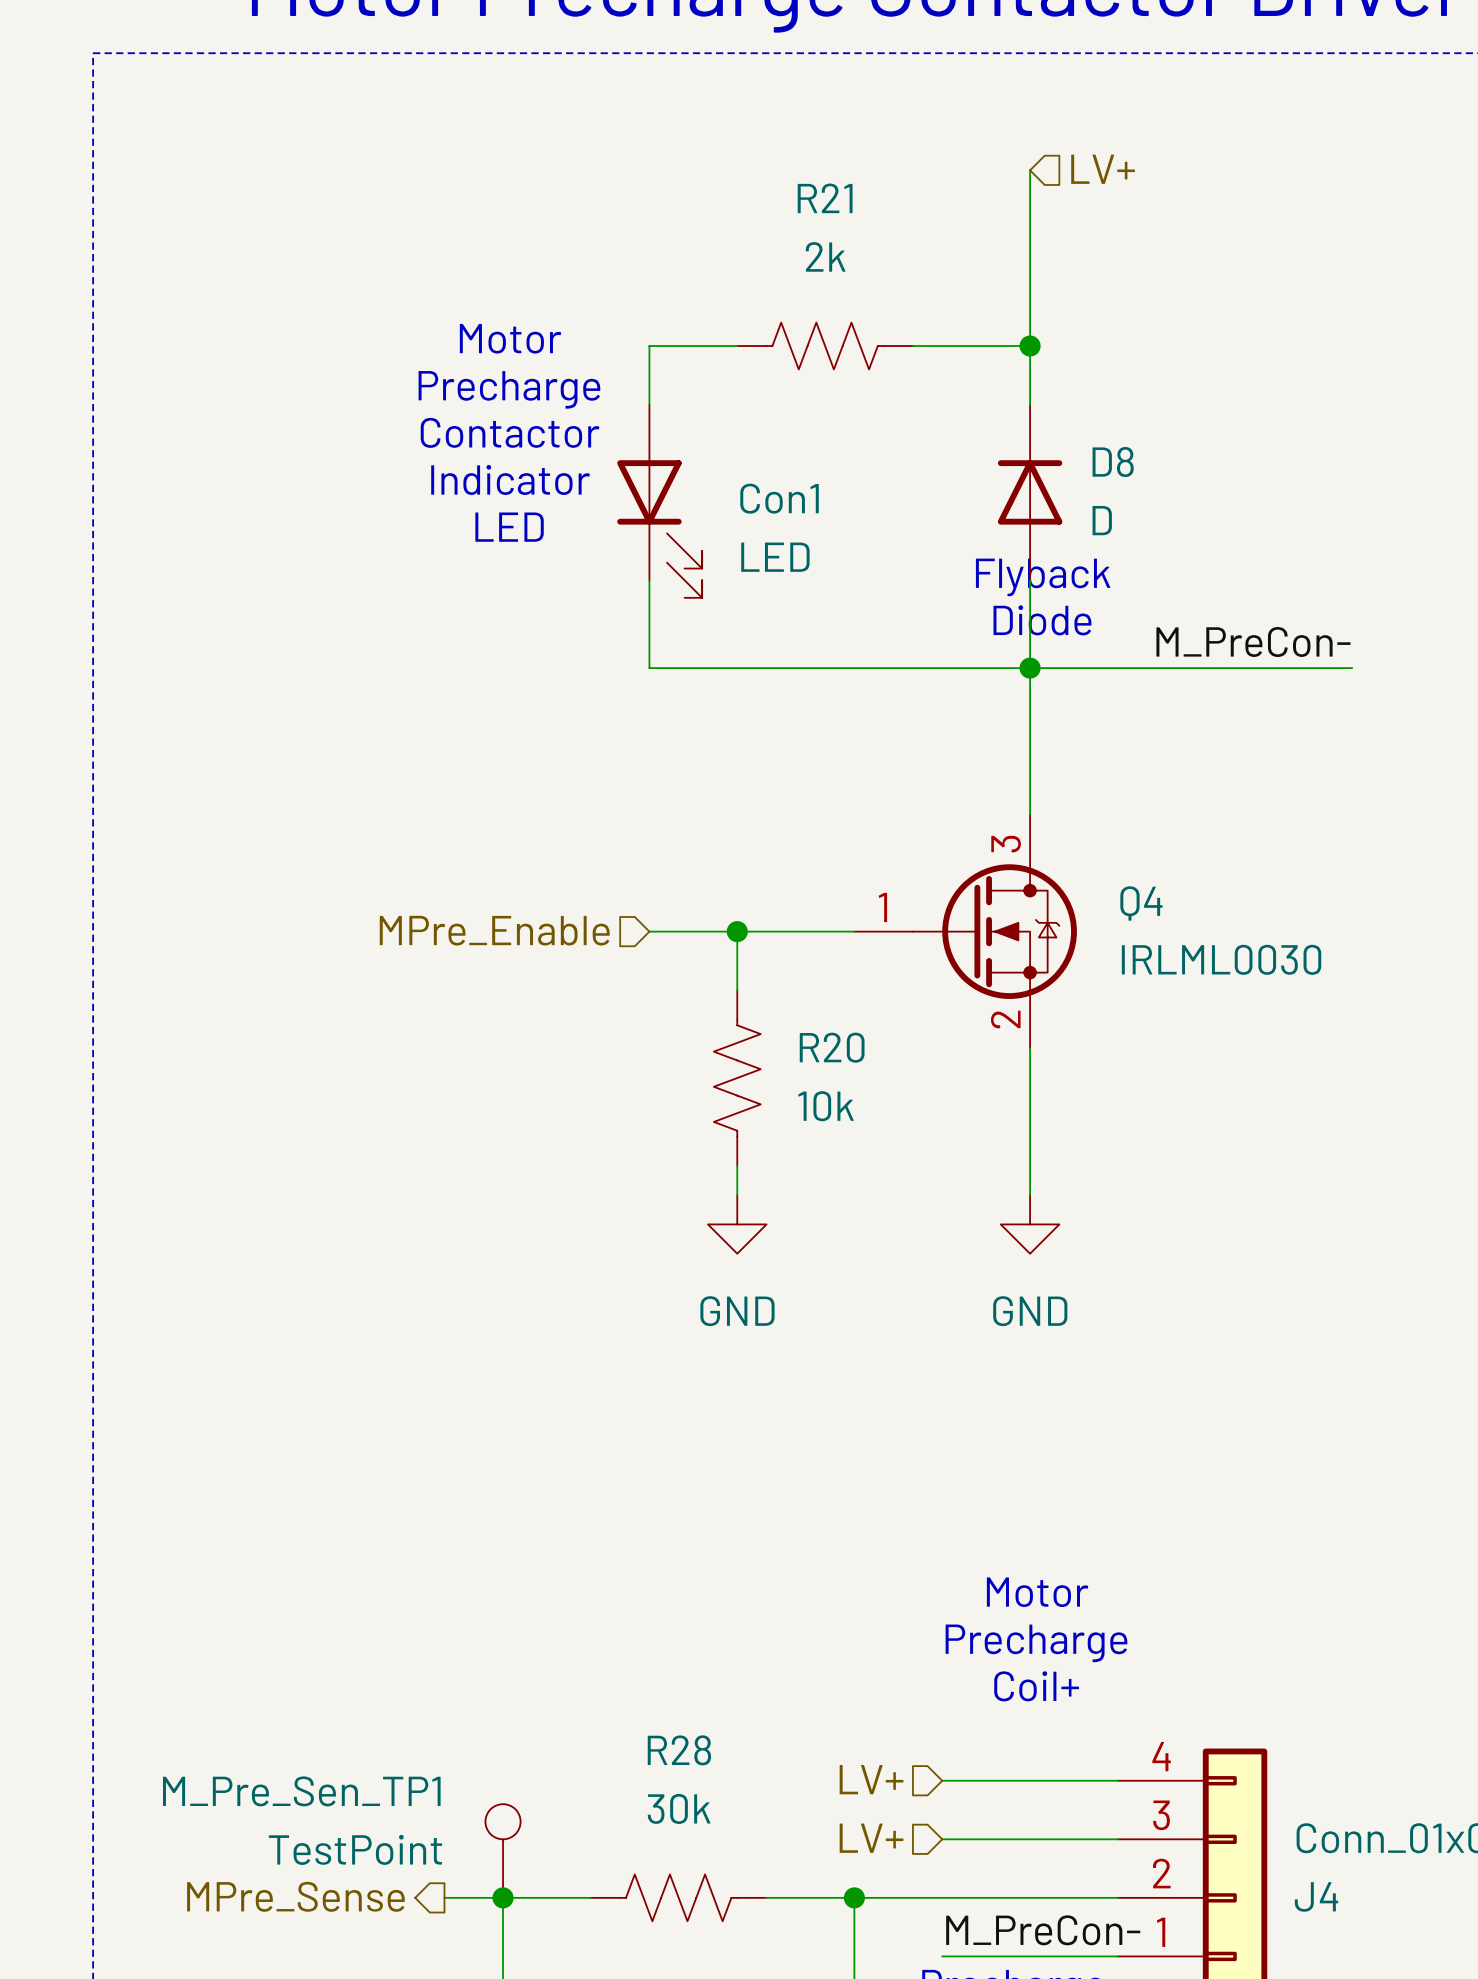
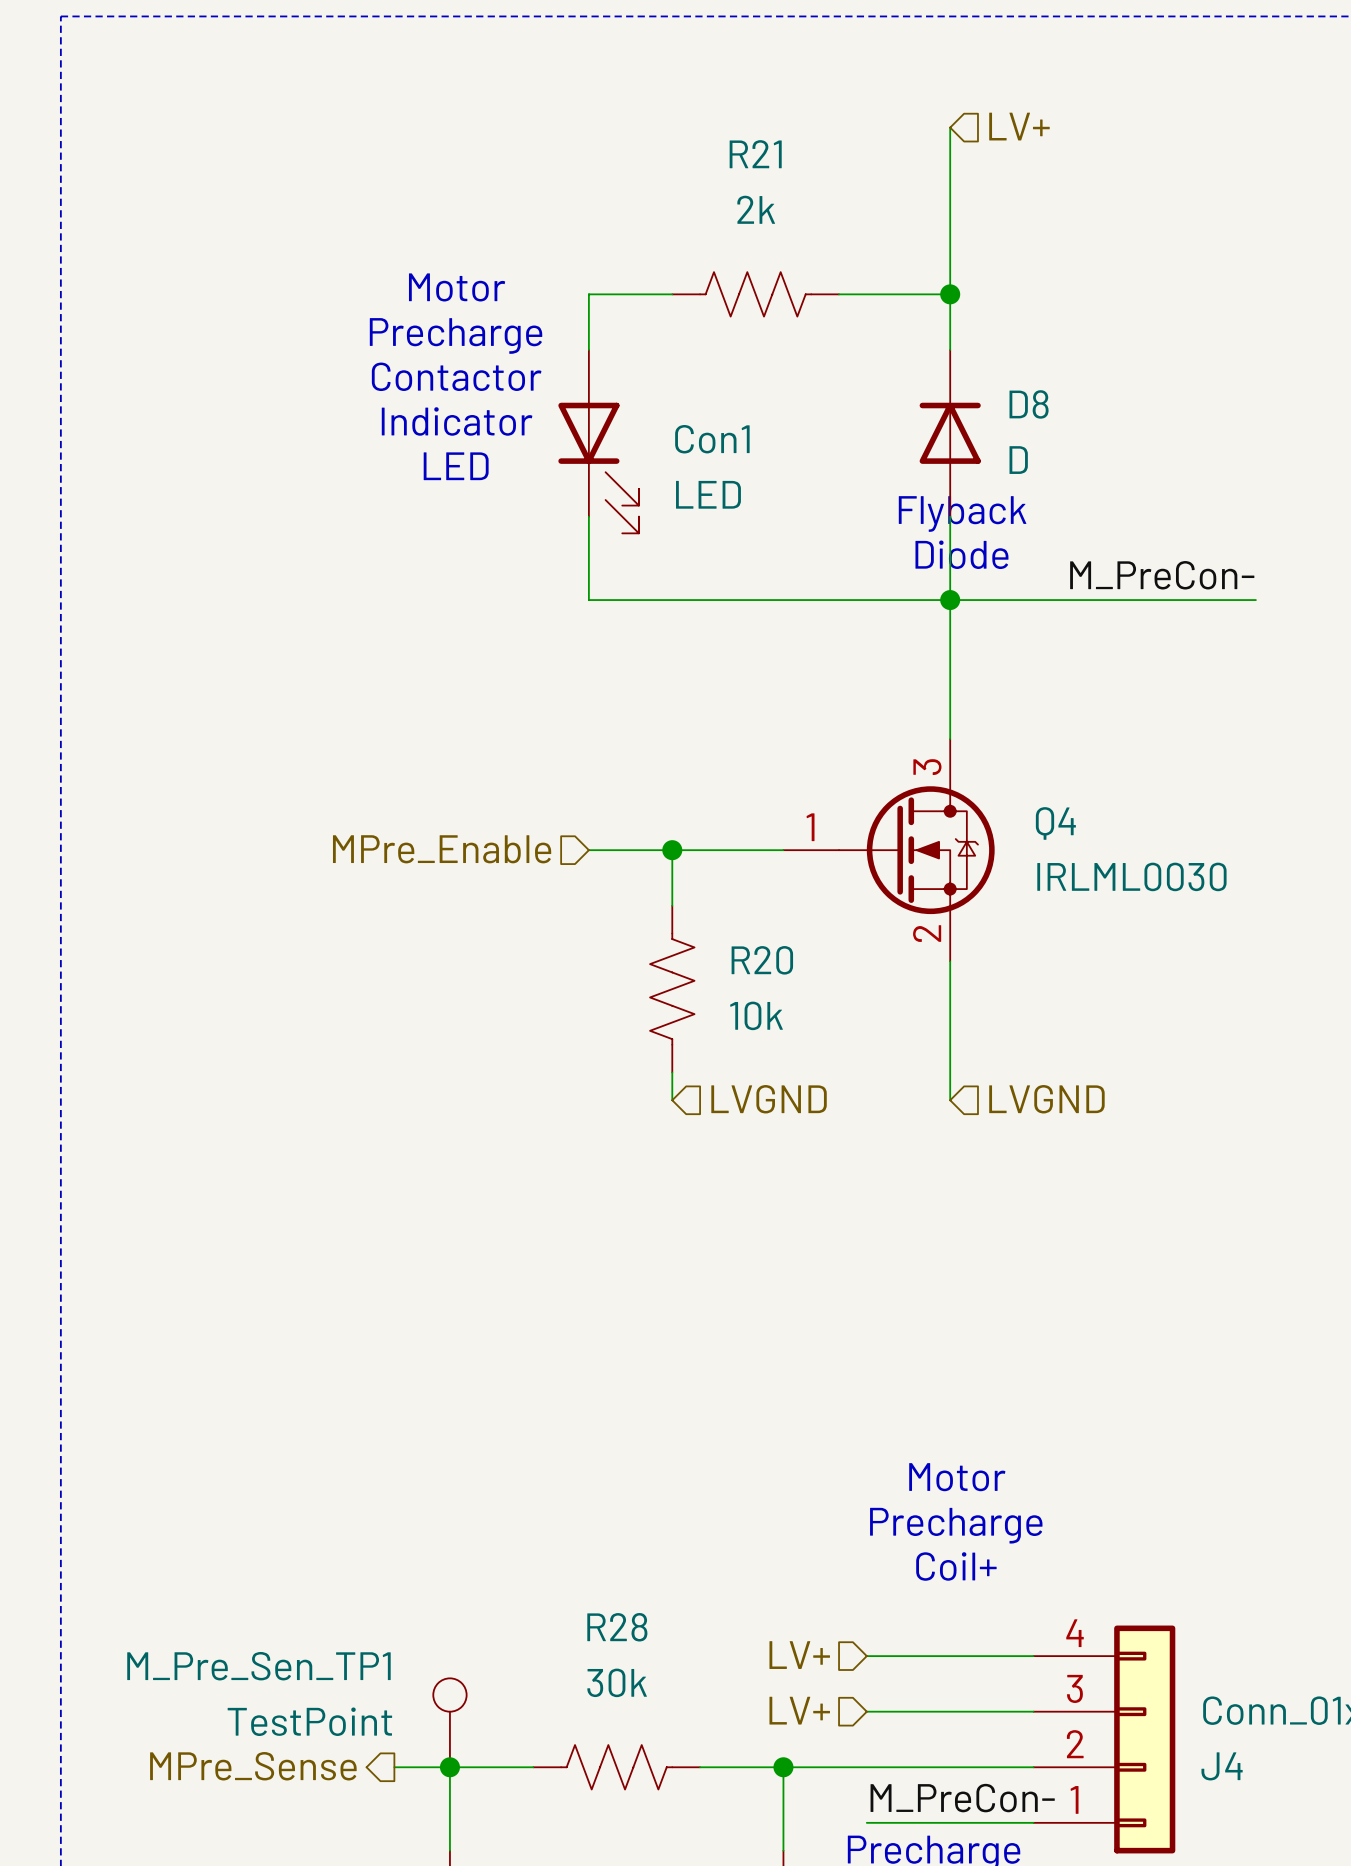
hierarchical label: none -> LVGND (769, 1099)
hierarchical label: none -> LVGND (1046, 1099)
power symbol: GND (737, 1224) -> none
power symbol: GND (1030, 1224) -> none

